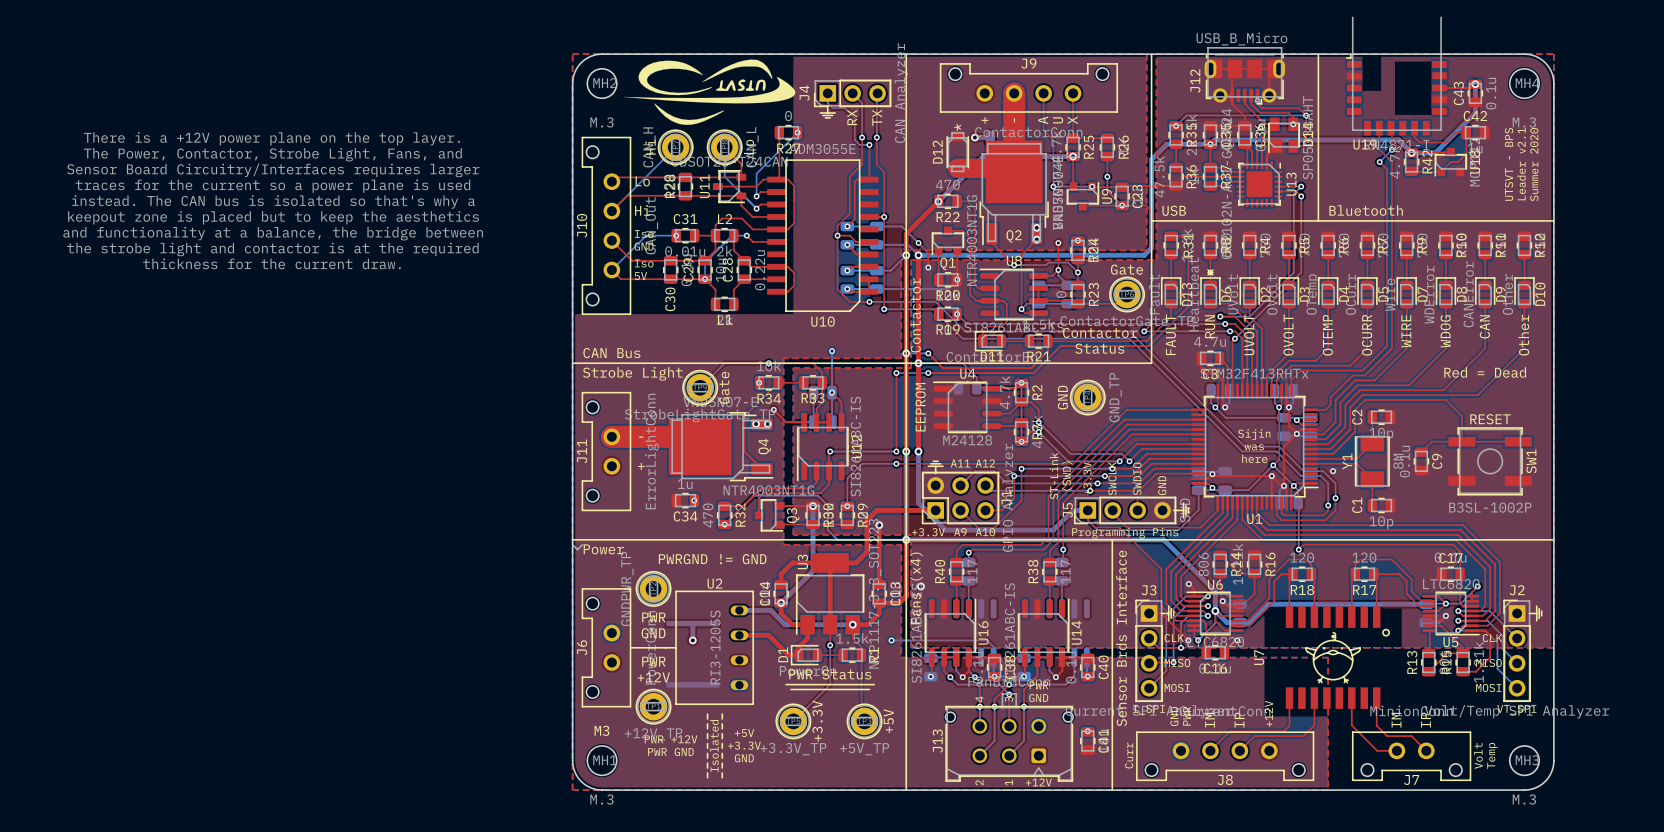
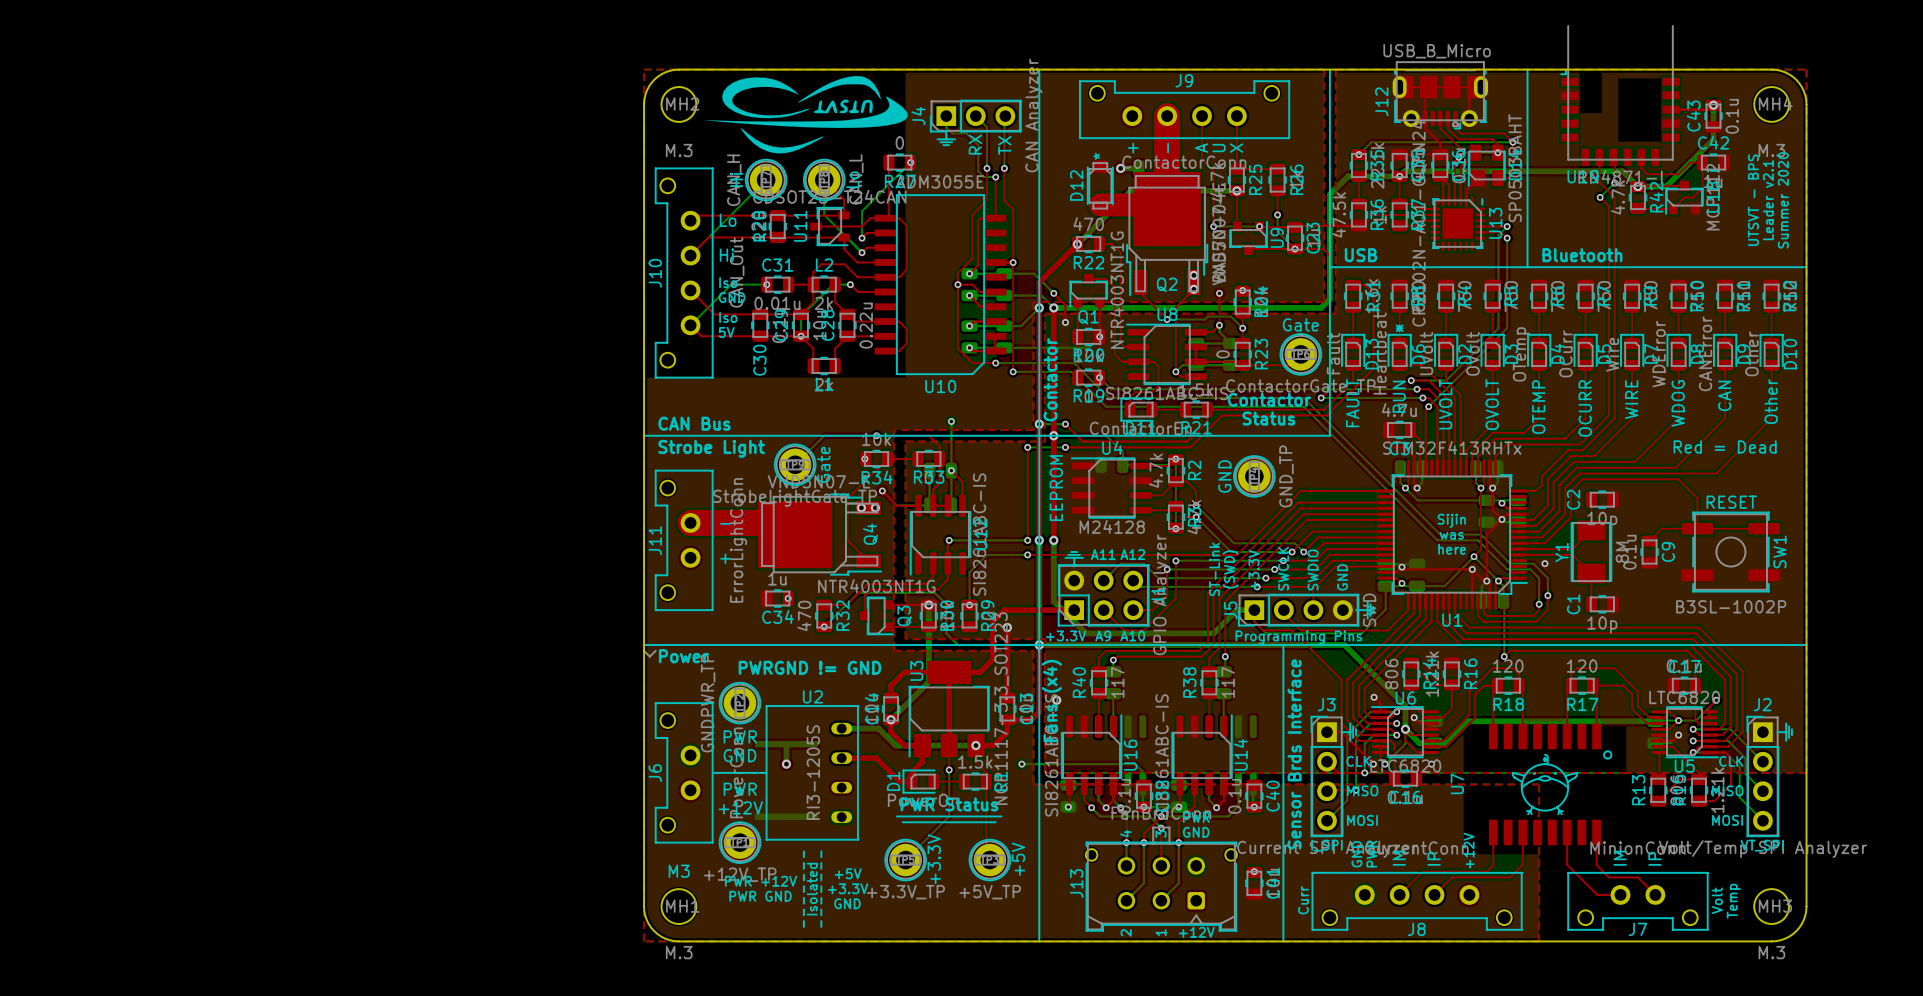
text: There is a +12V power plane on the top layer. (271, 138) -> none
text: The Power, Contactor, Strobe Light, Fans, and (272, 154) -> none
text: Sensor Board Circuitry/Interfaces requires larger (273, 170) -> none
text: traces for the current so a power plane is used (272, 186) -> none
text: instead. The CAN bus is isolated so that's why a (273, 202) -> none
text: keepout zone is placed but to keep the aesthetics (273, 217) -> none
text: and functionality at a balance, the bridge between (273, 233) -> none
text: the strobe light and contactor is at the required (272, 249) -> none
text: thickness for the current draw. (272, 263) -> none

